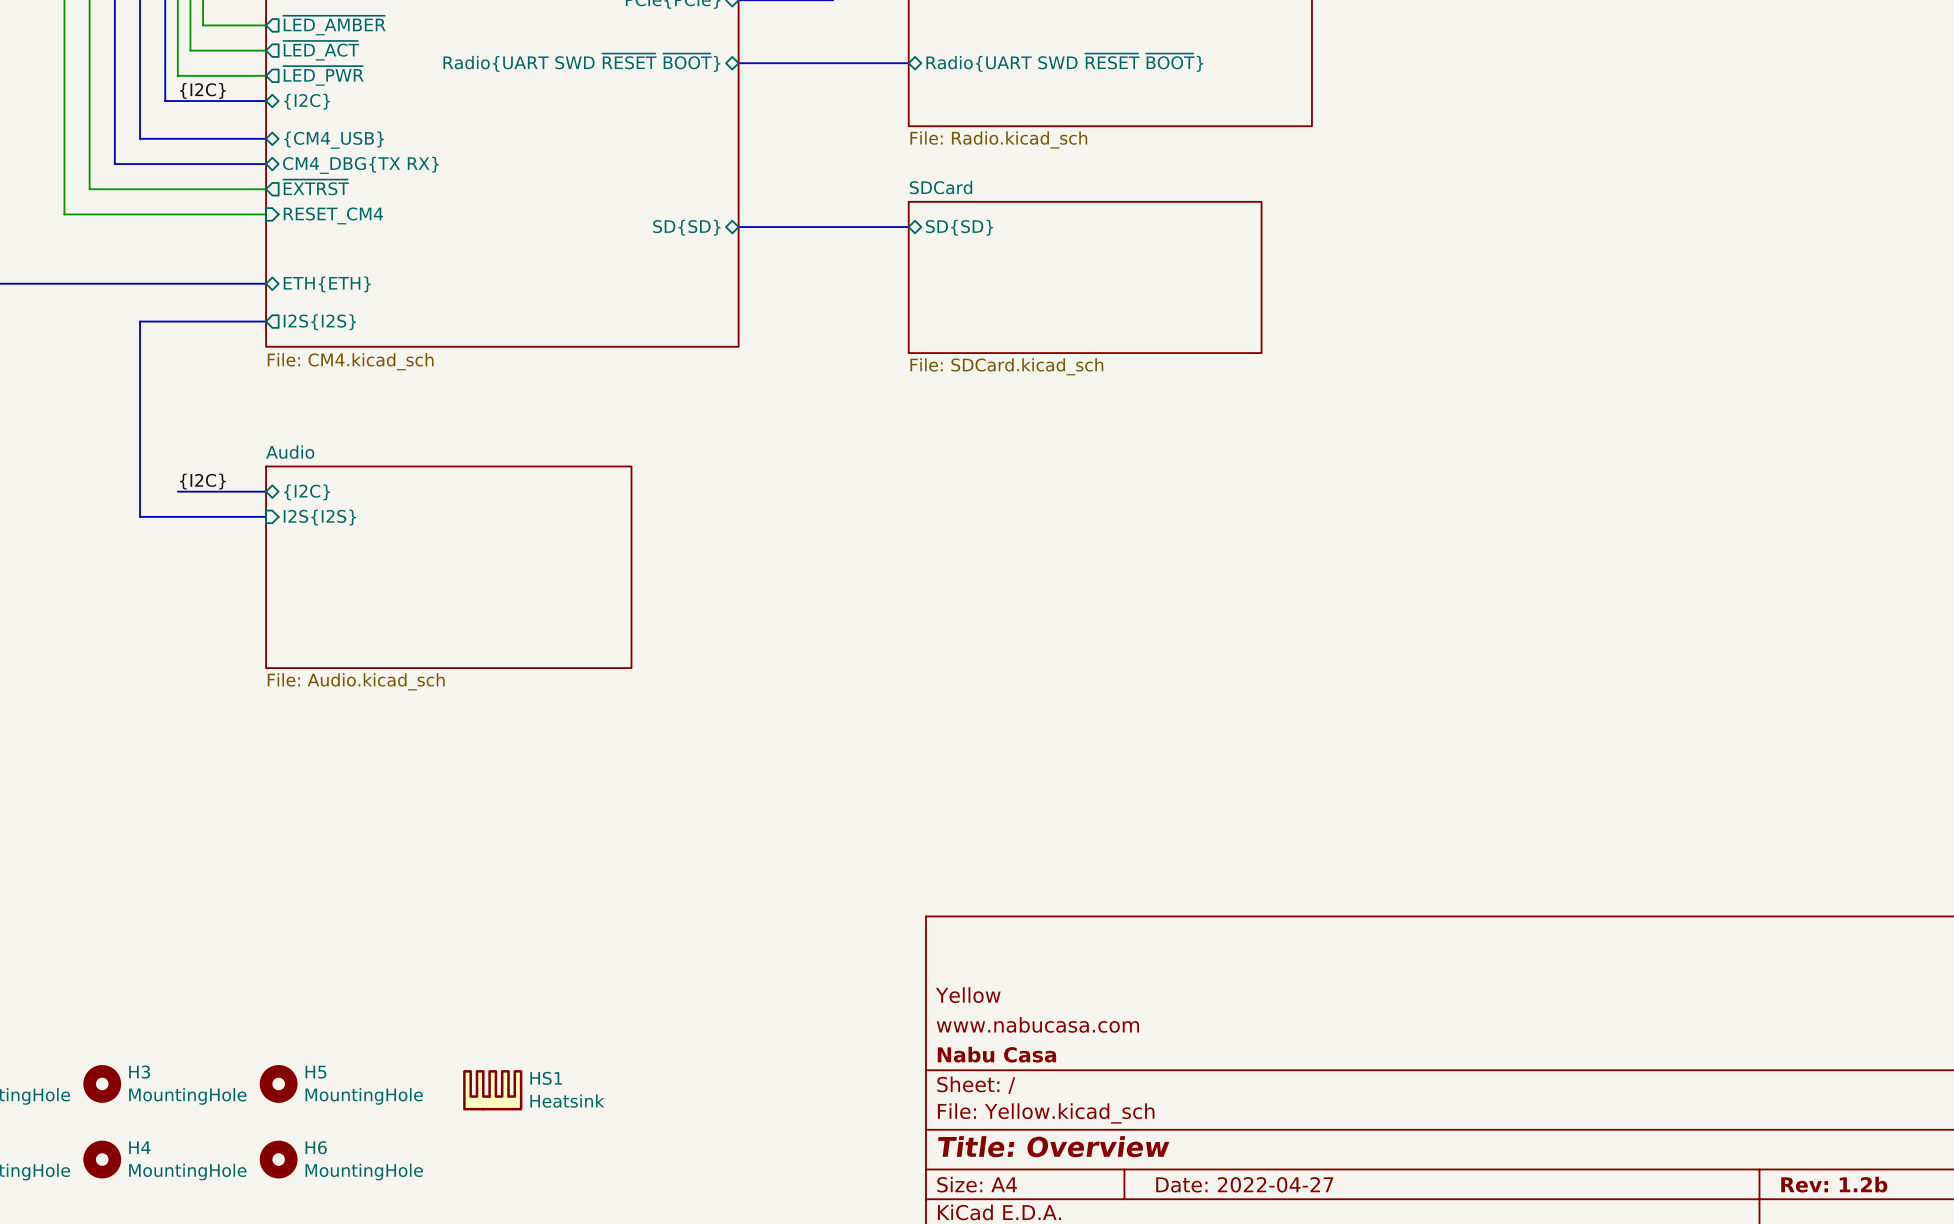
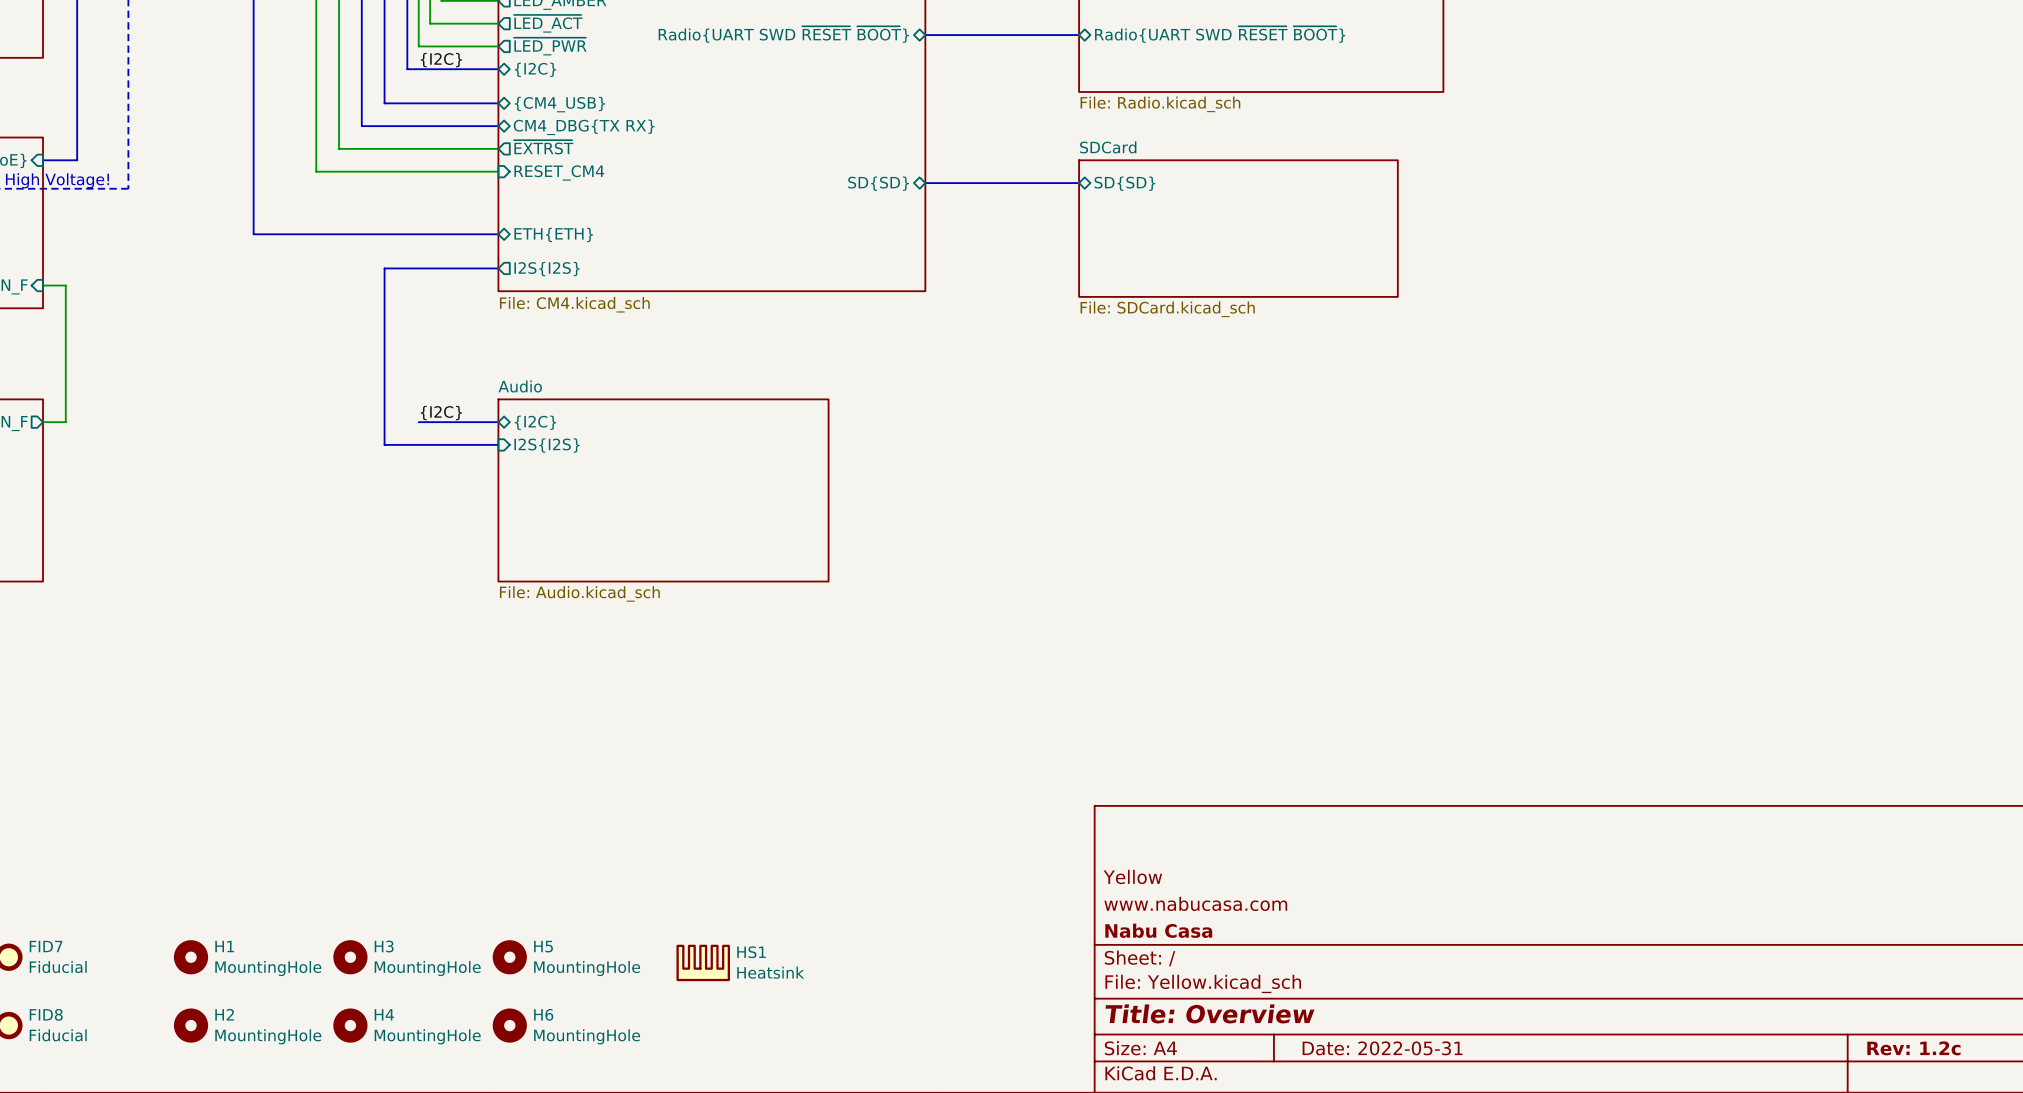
title block: Date: 2022-04-27 (1244, 1184) -> Date: 2022-05-31 (1382, 1048)
title block: Rev: 1.2b (1834, 1184) -> Rev: 1.2c (1913, 1048)

